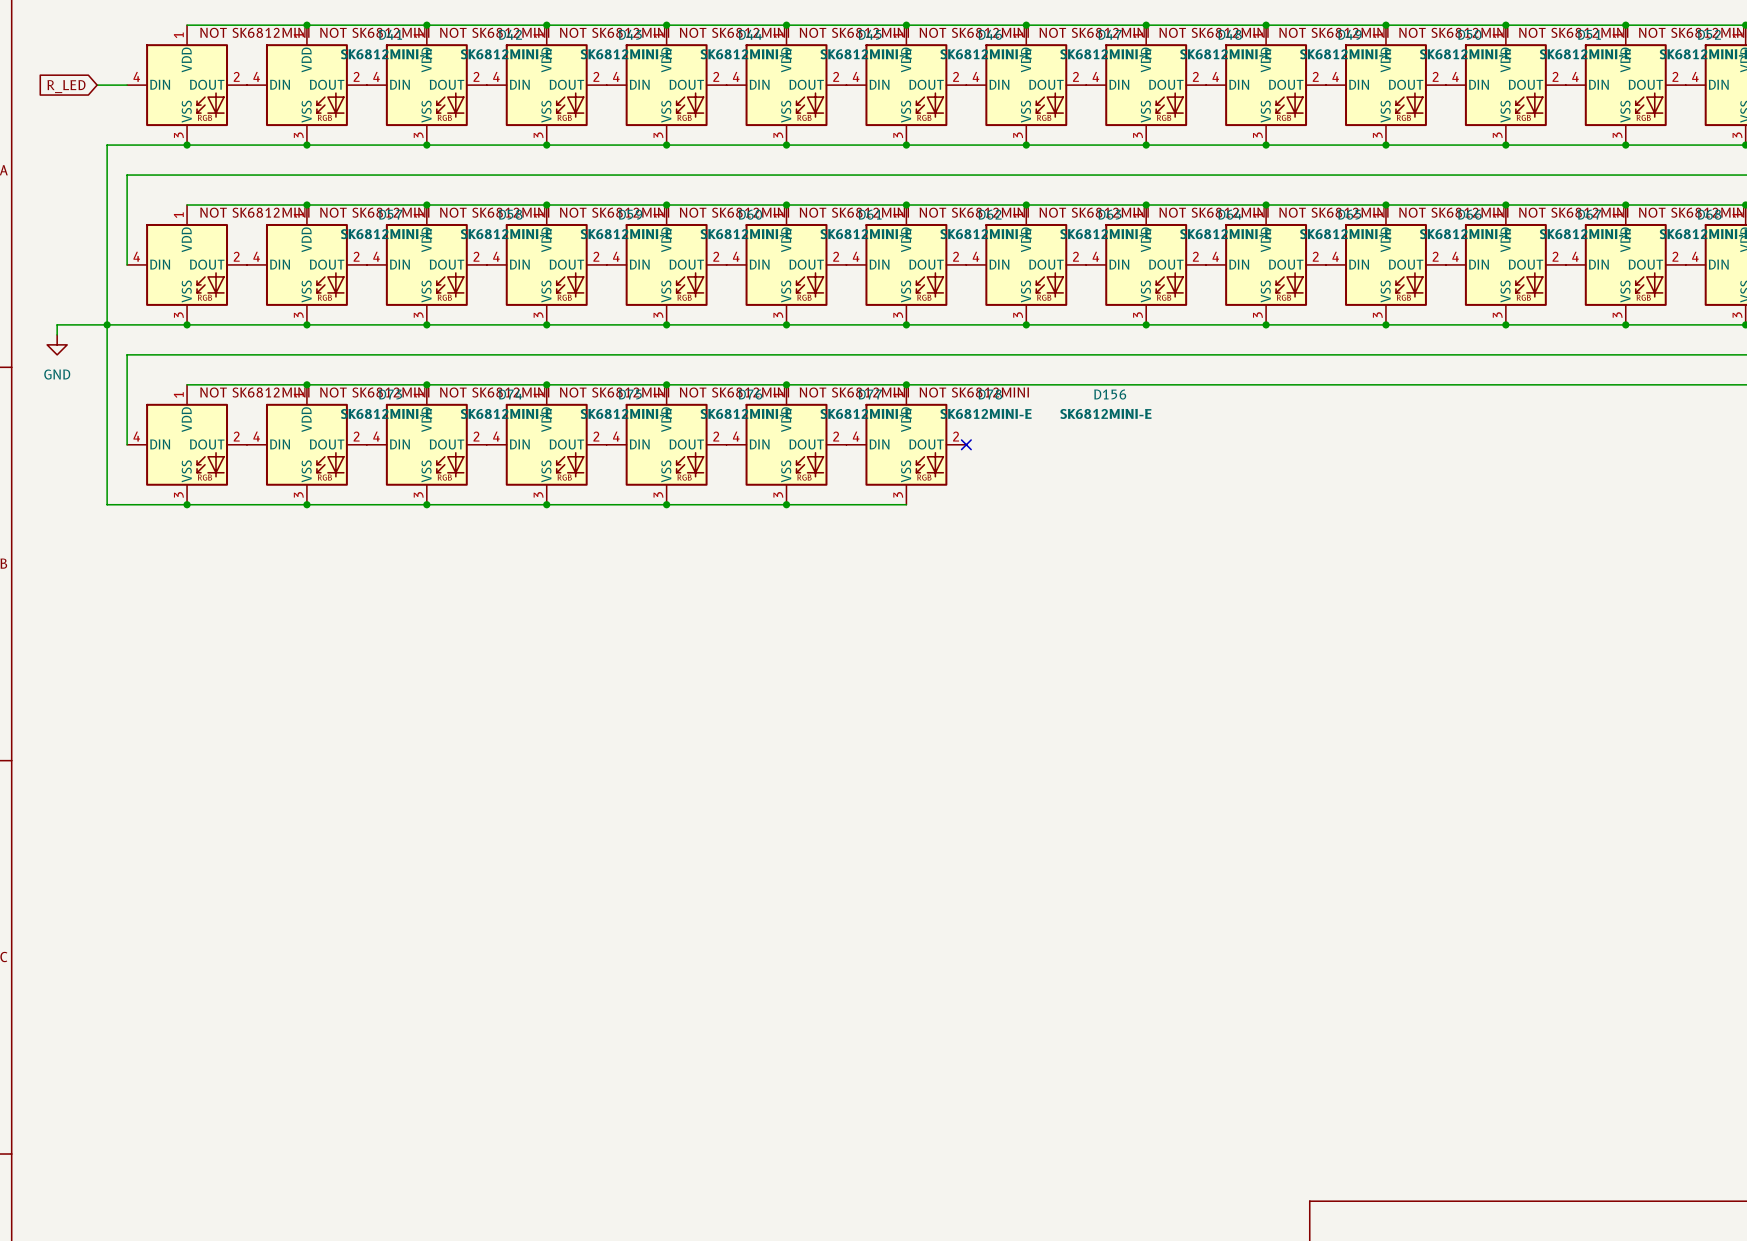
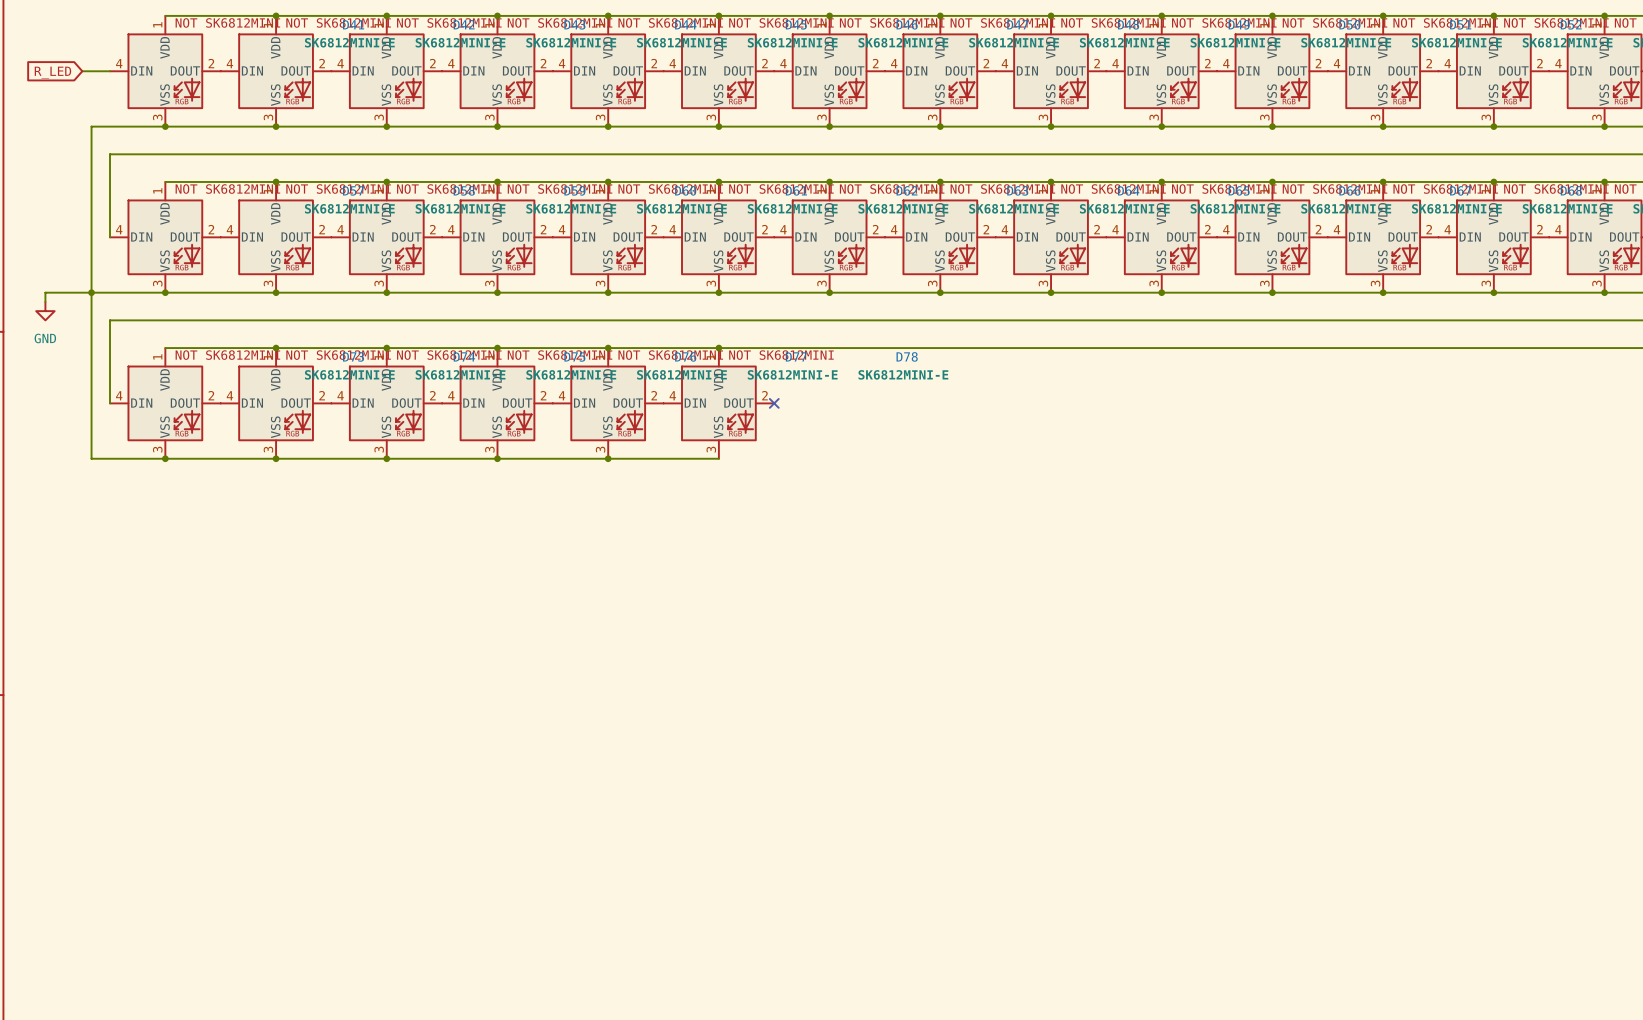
junction: (906, 384) -> none
no-connect mark: none -> (774, 403)
D156: SK6812MINI-E (906, 444) -> none
no-connect mark: (966, 444) -> none
wire: (786, 504) (906, 504) -> none
junction: (786, 504) -> none

